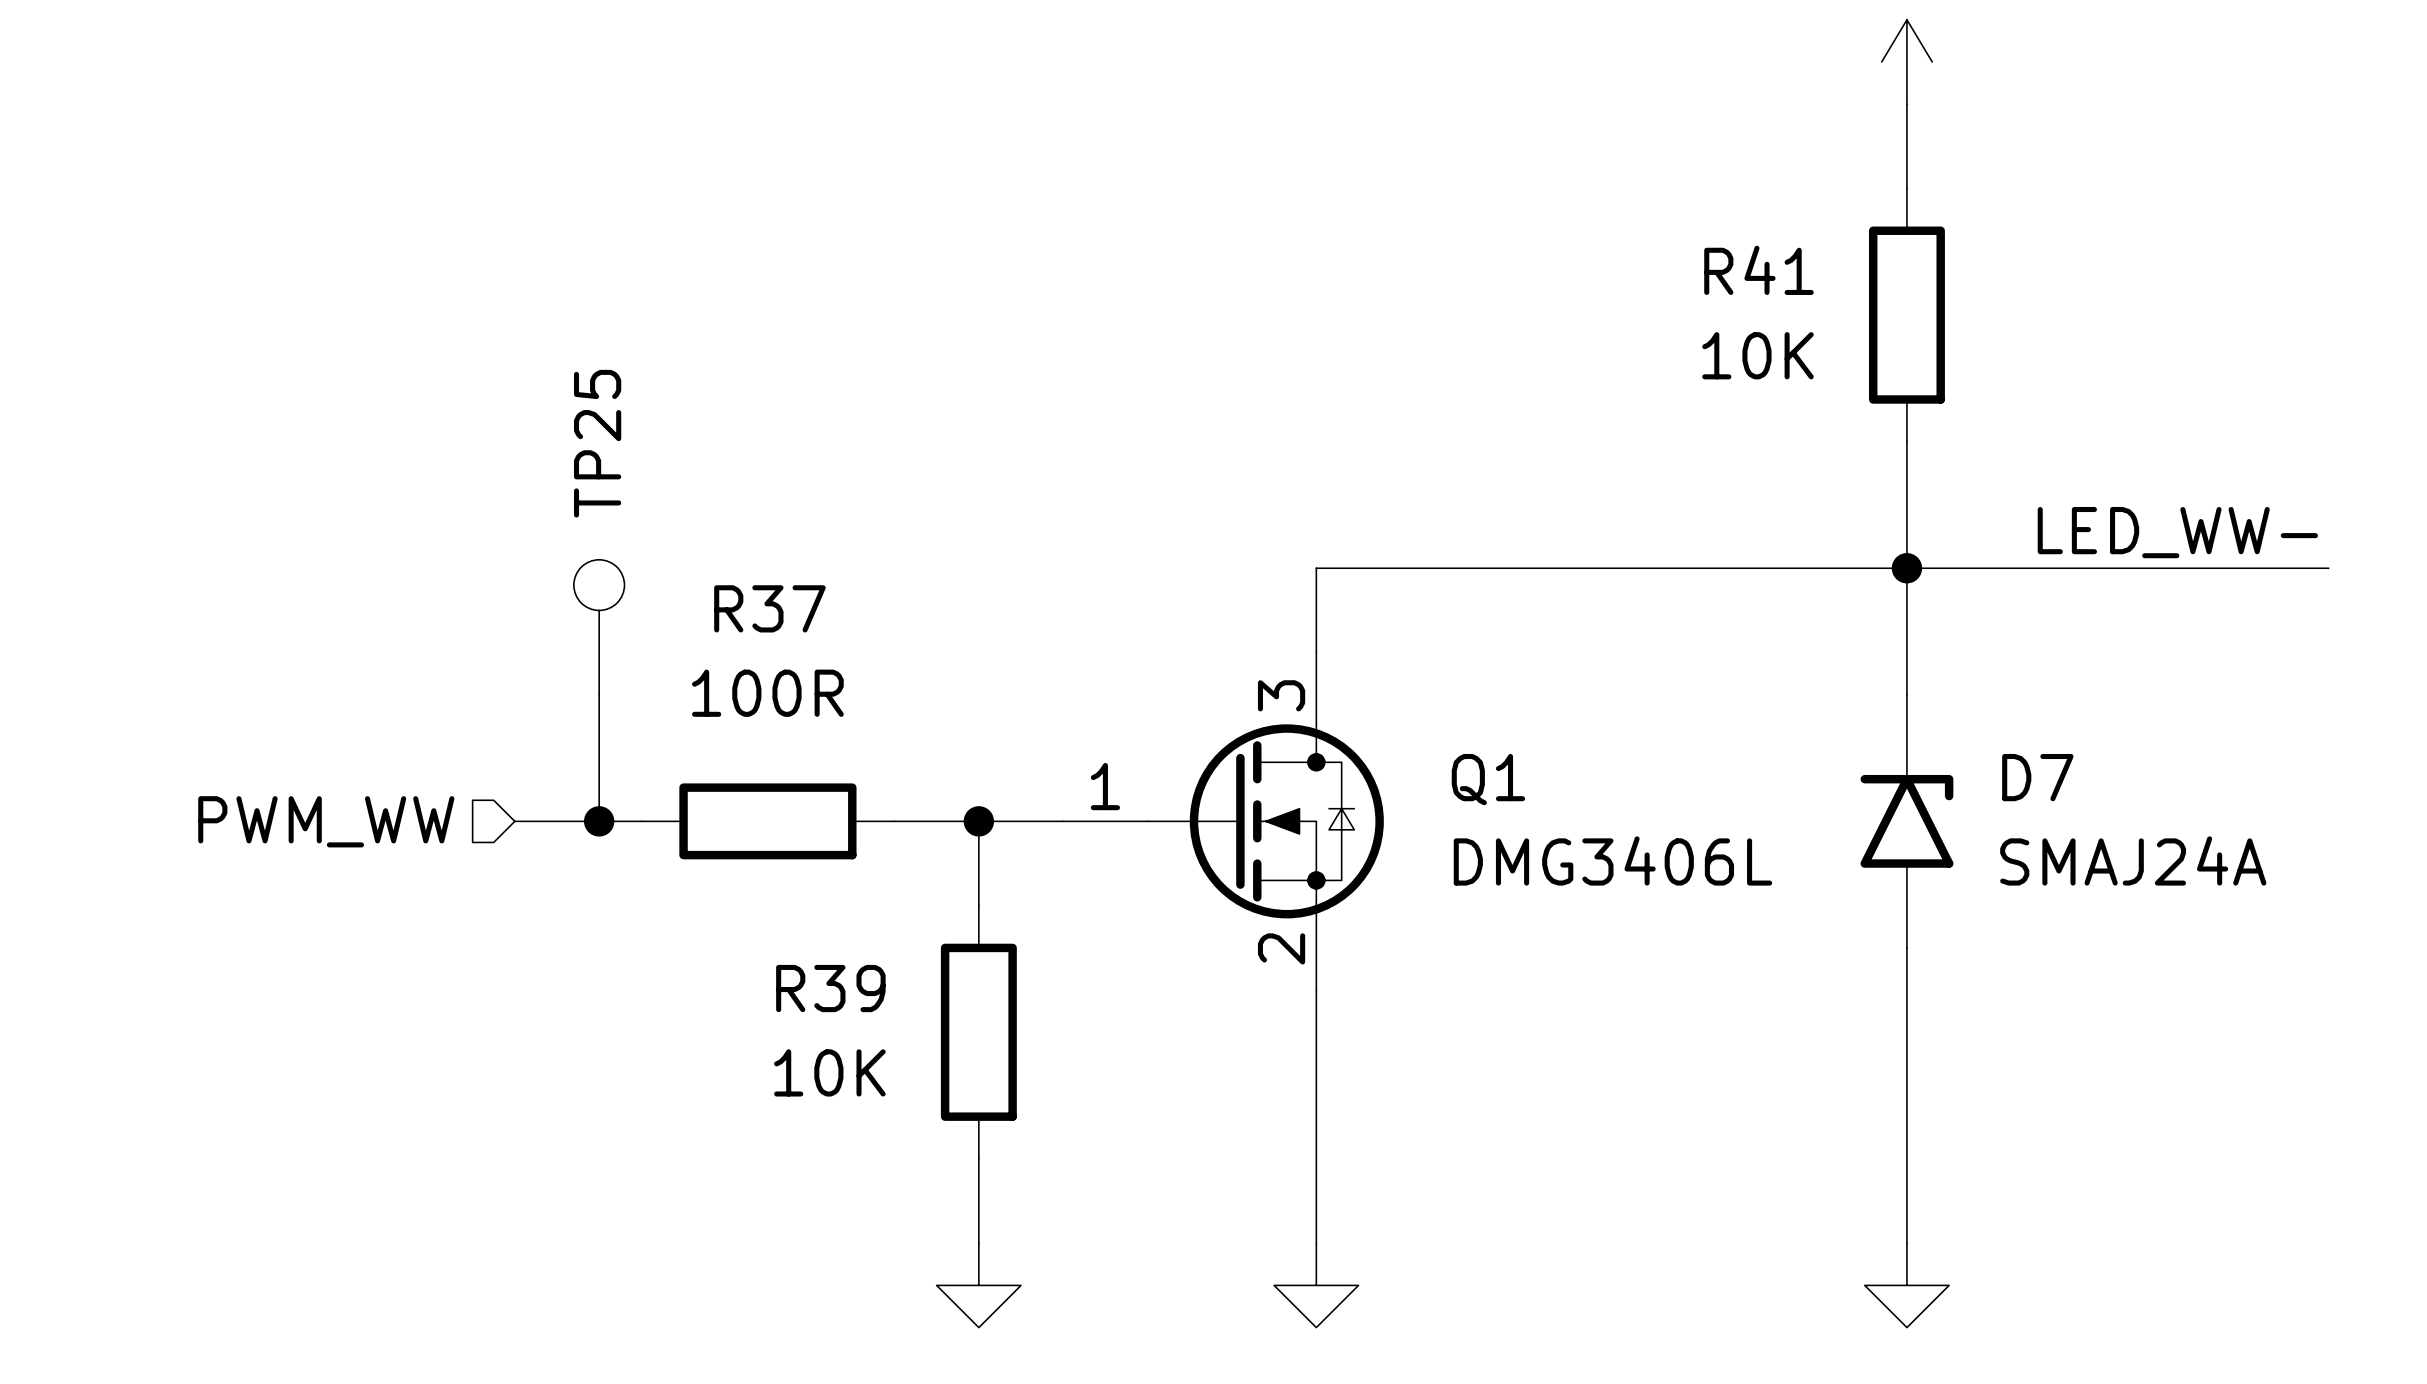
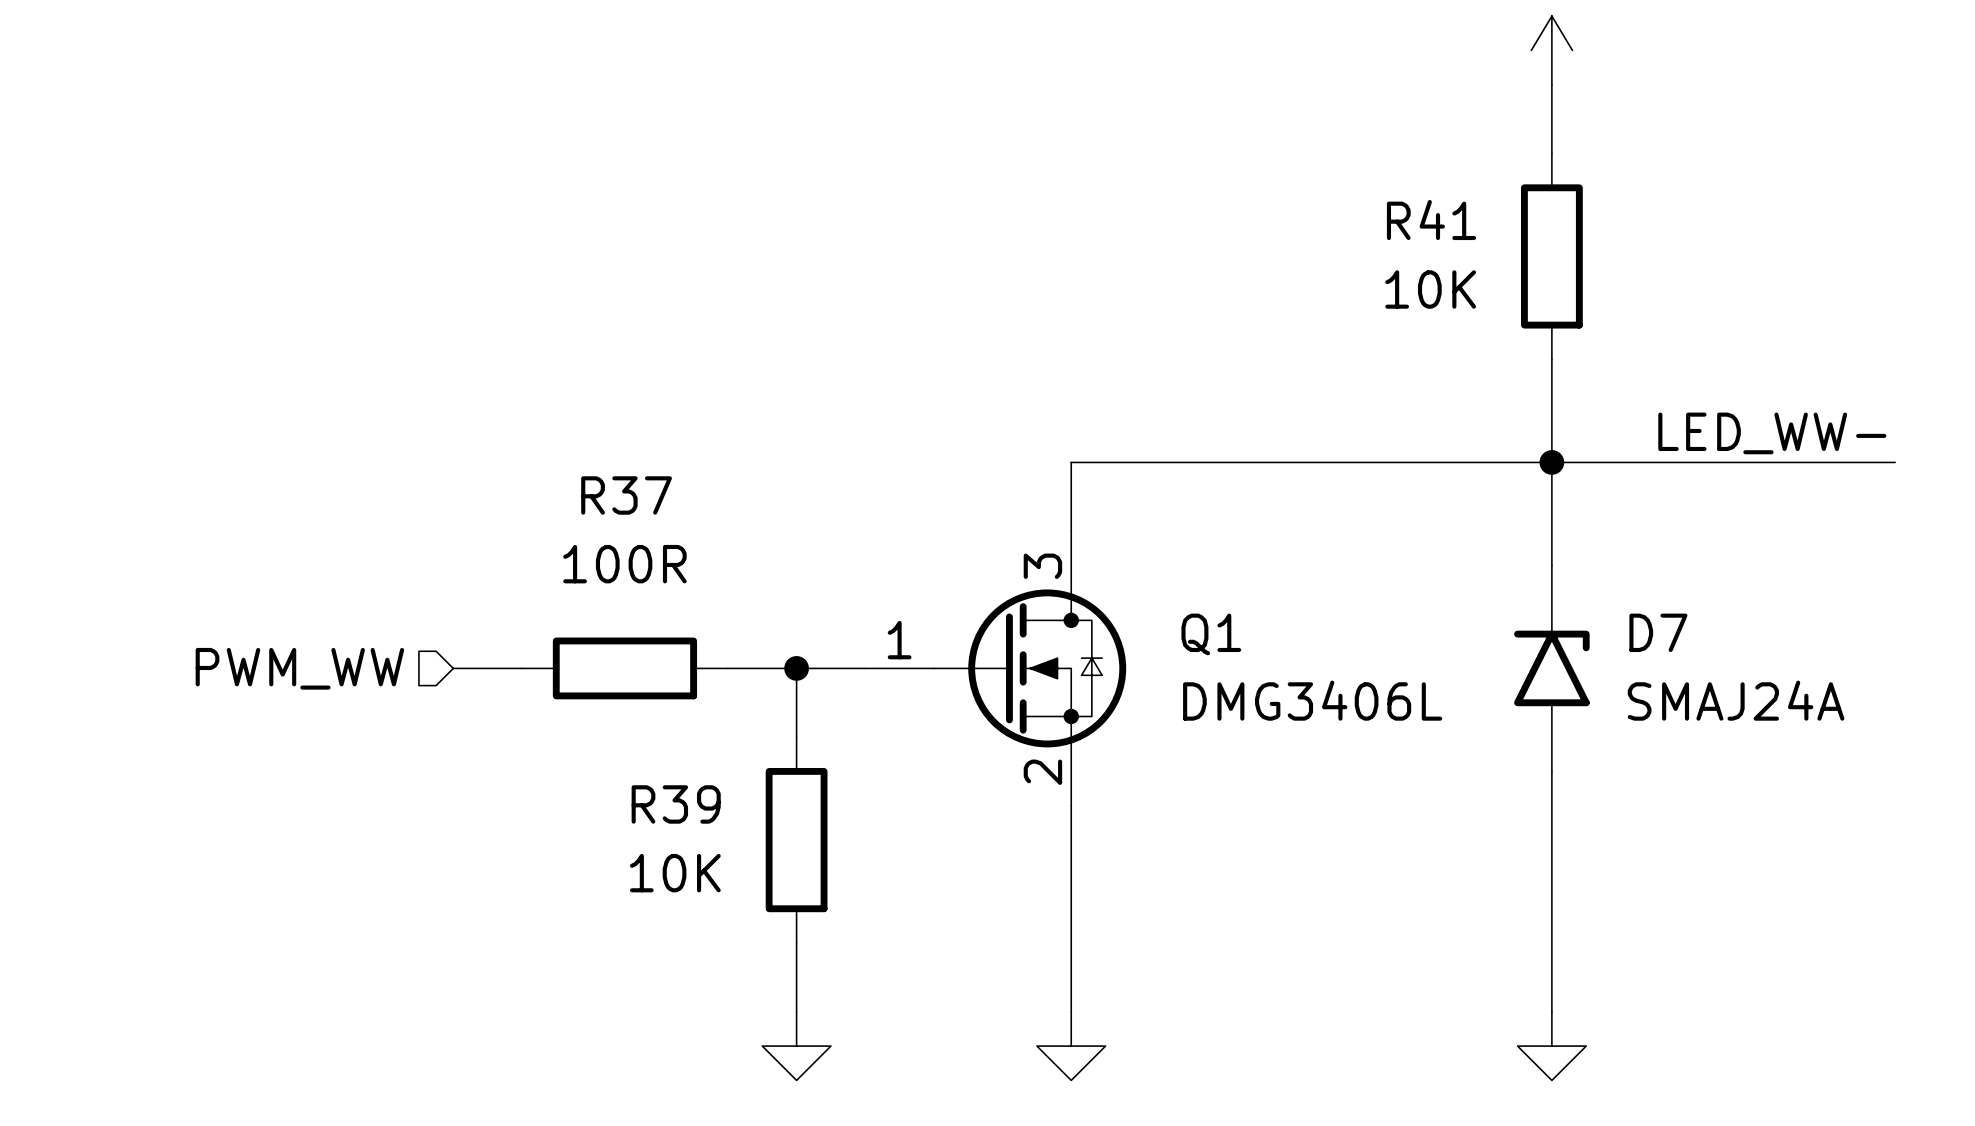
TP25: (599, 627) -> none
wire: (599, 694) (599, 821) -> none
hierarchical label position: PWM_WW (326, 821) -> PWM_WW (299, 668)
wire: (514, 821) (556, 821) -> none
junction: (599, 821) -> none

